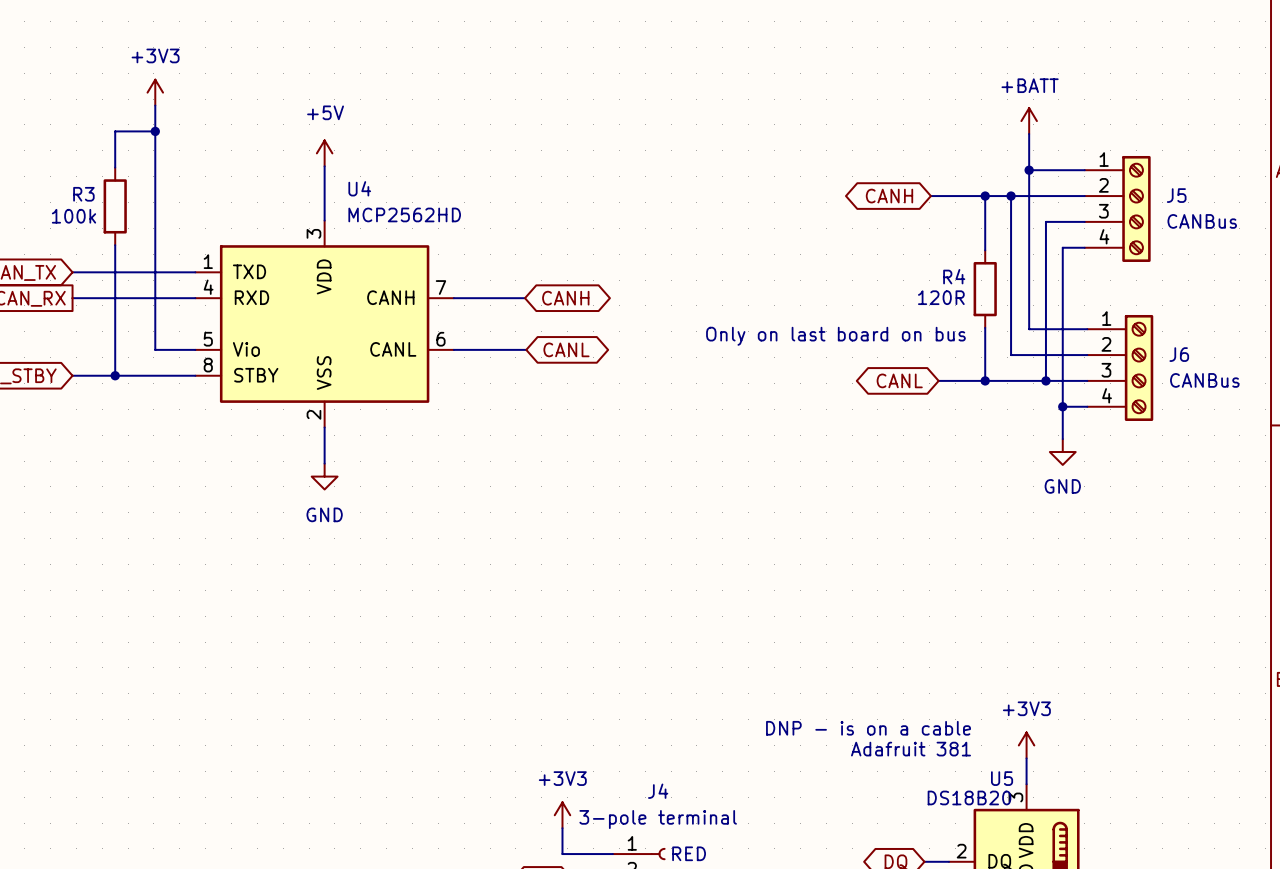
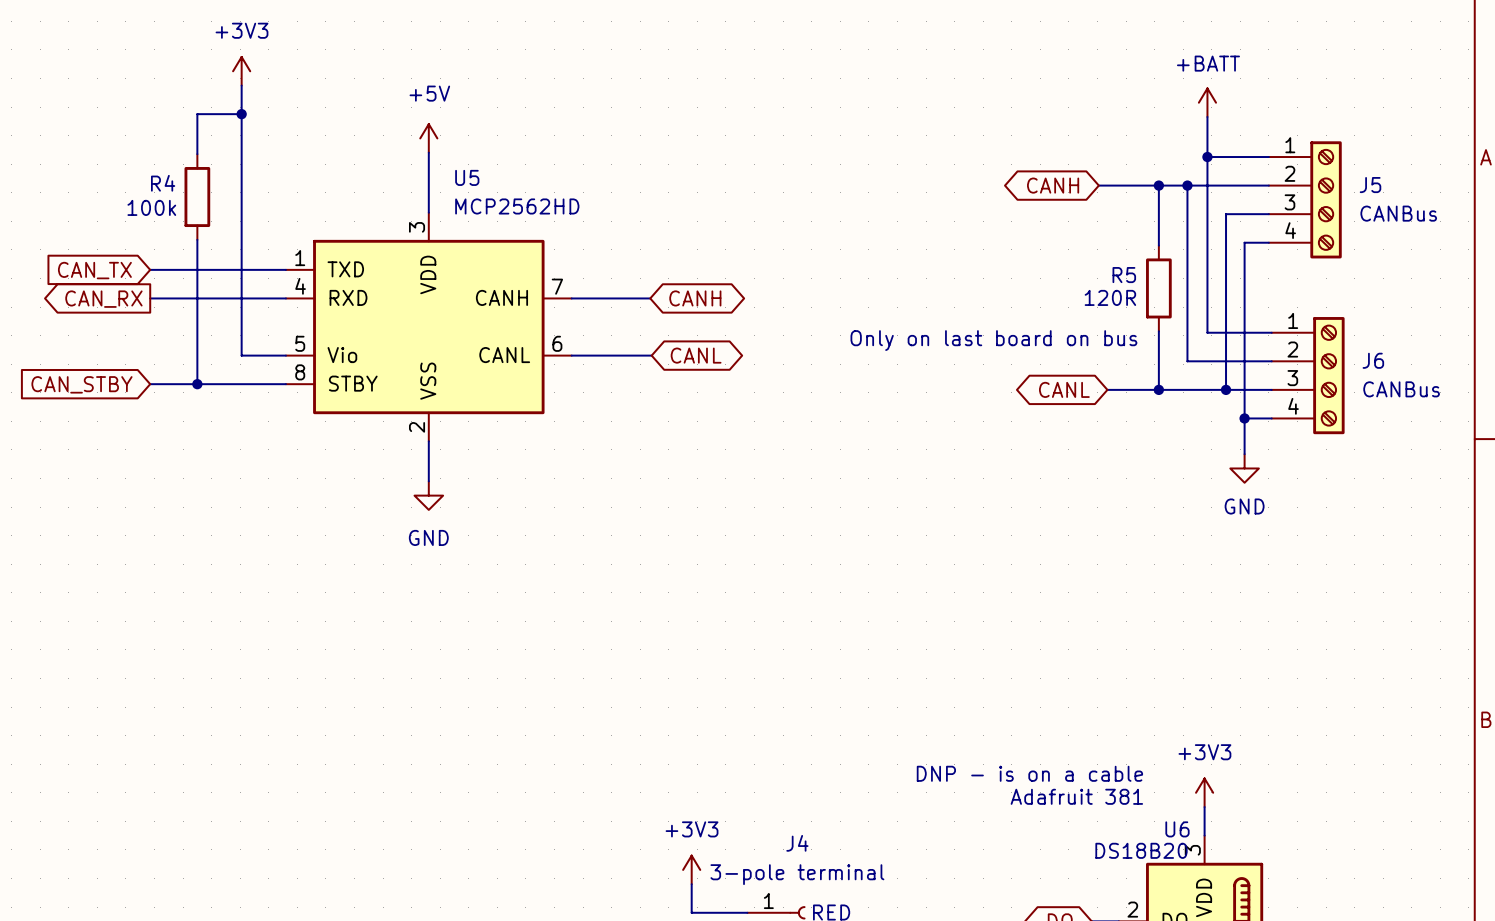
U4 name: U4 (359, 188) -> U5 (467, 177)
R3 name: R3 (83, 194) -> R4 (163, 183)
R4 name: R4 (954, 276) -> R5 (1124, 275)
U5 name: U5 (1002, 778) -> U6 (1177, 829)

